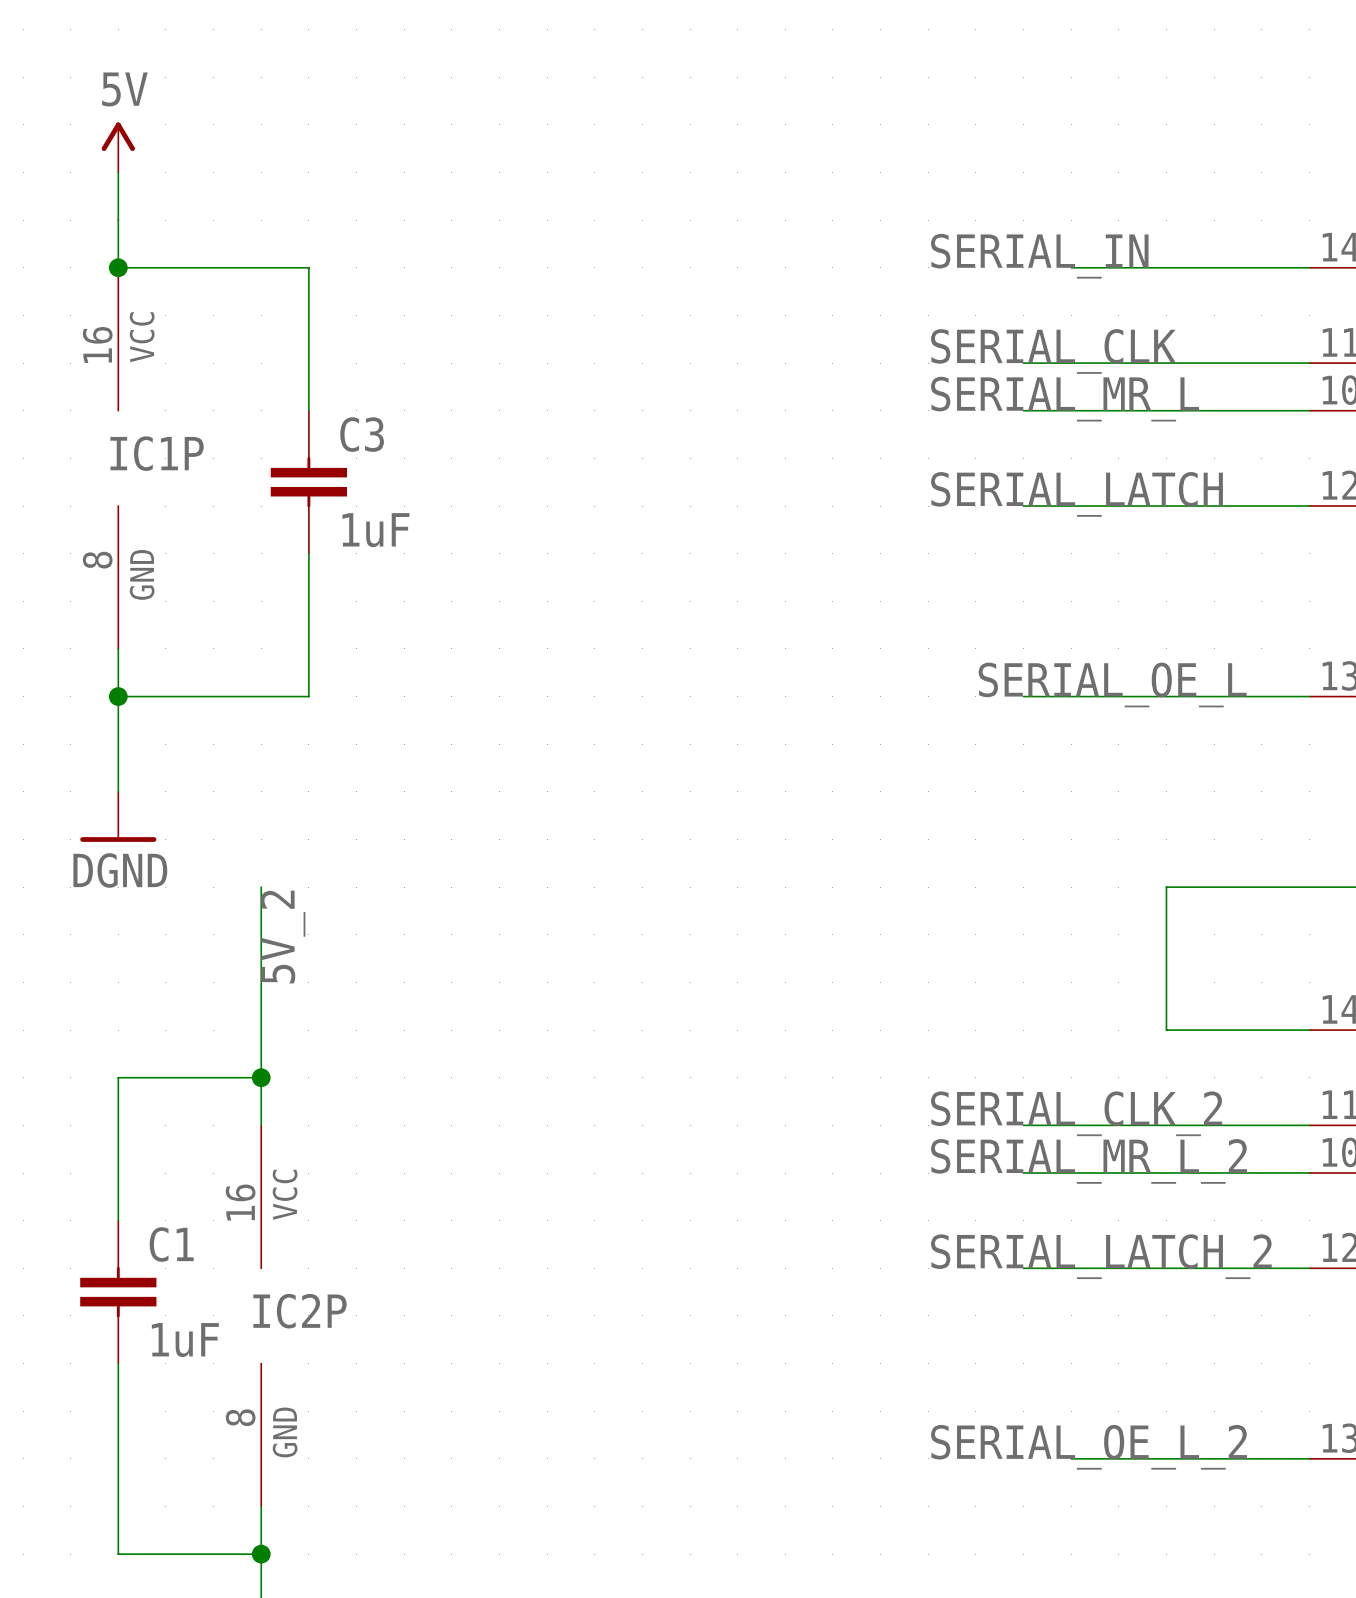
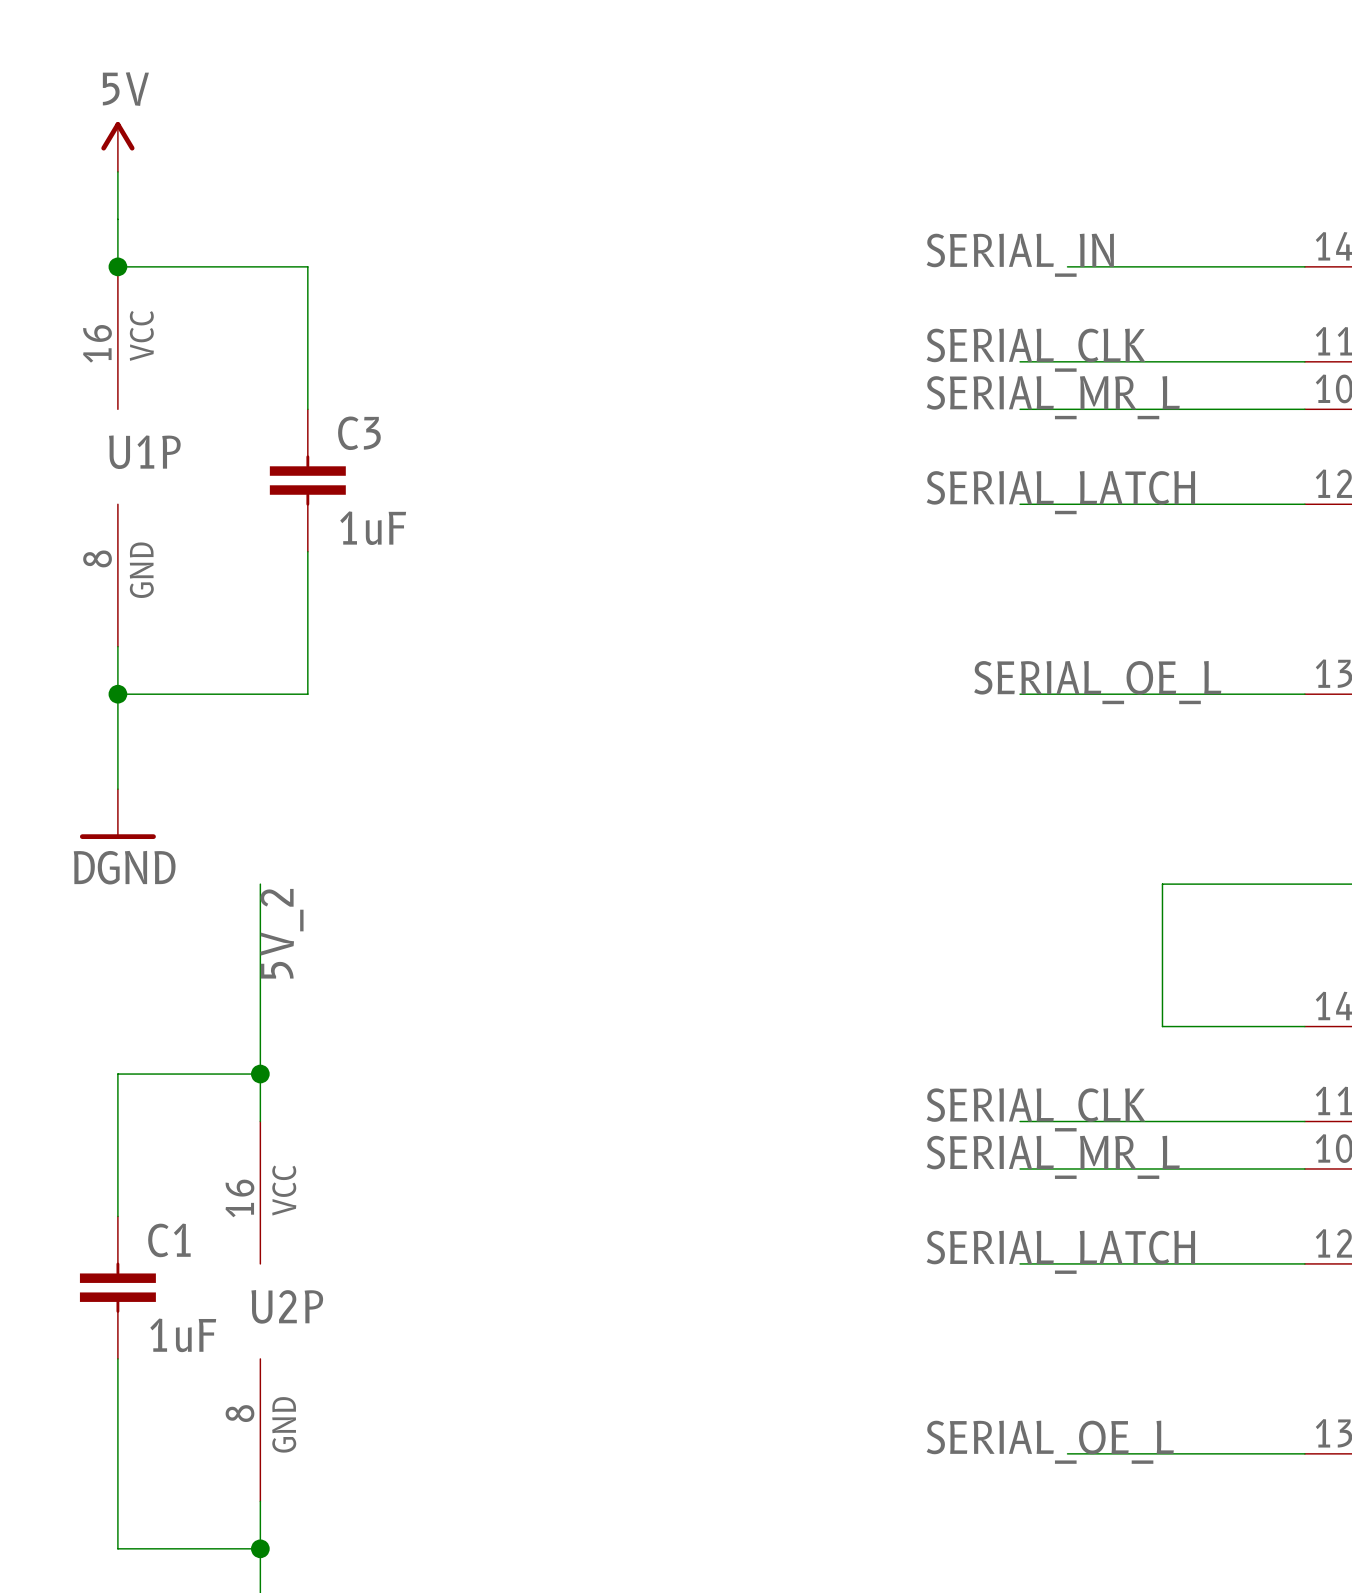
IC1P name: IC1P (157, 453) -> U1P (144, 452)
label: SERIAL_CLK_2 (1076, 1113) -> SERIAL_CLK (1035, 1109)
label: SERIAL_MR_L_2 (1089, 1161) -> SERIAL_MR_L (1053, 1157)
label: SERIAL_LATCH_2 (1101, 1256) -> SERIAL_LATCH (1060, 1252)
IC2P name: IC2P (300, 1311) -> U2P (287, 1306)
label: SERIAL_OE_L_2 (1089, 1447) -> SERIAL_OE_L (1050, 1442)

